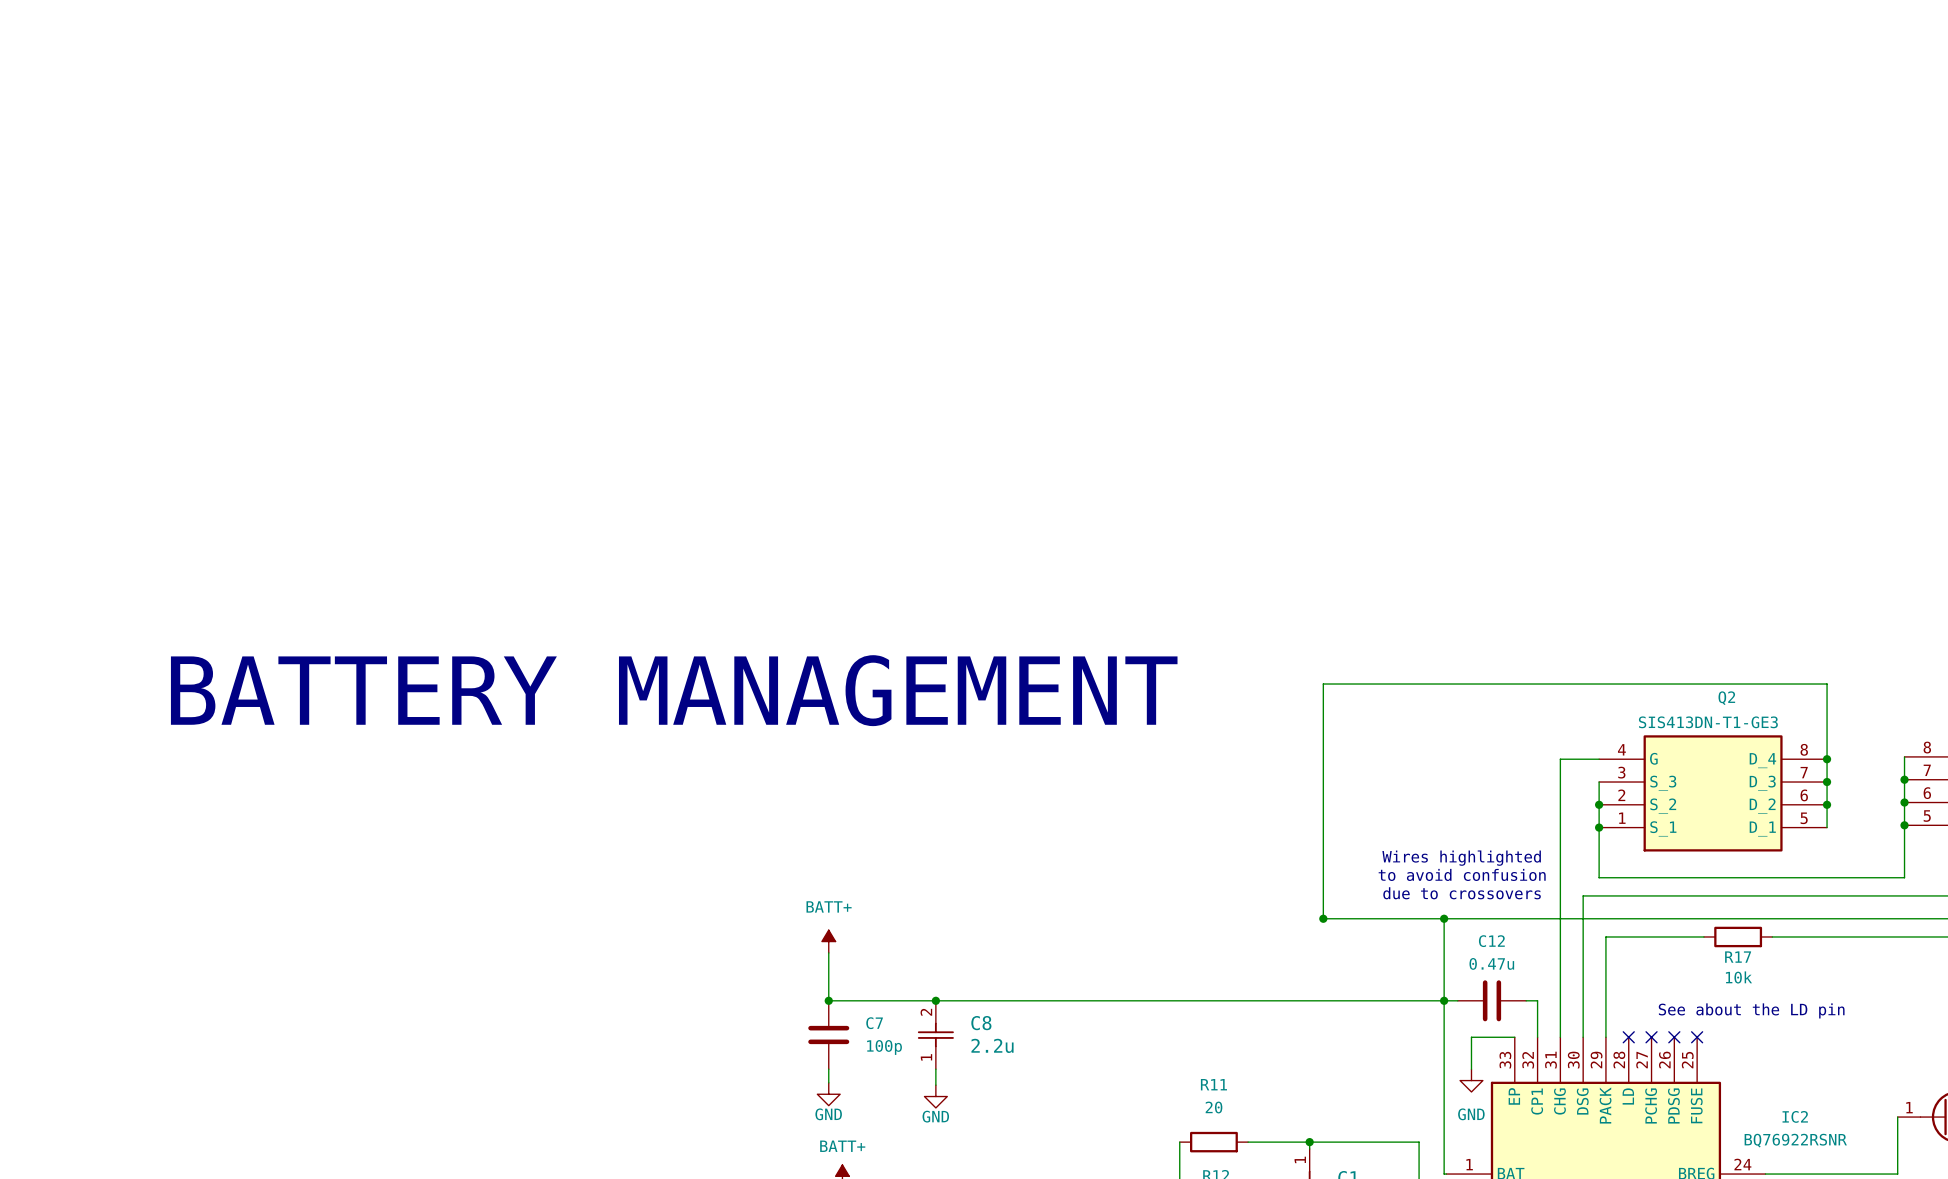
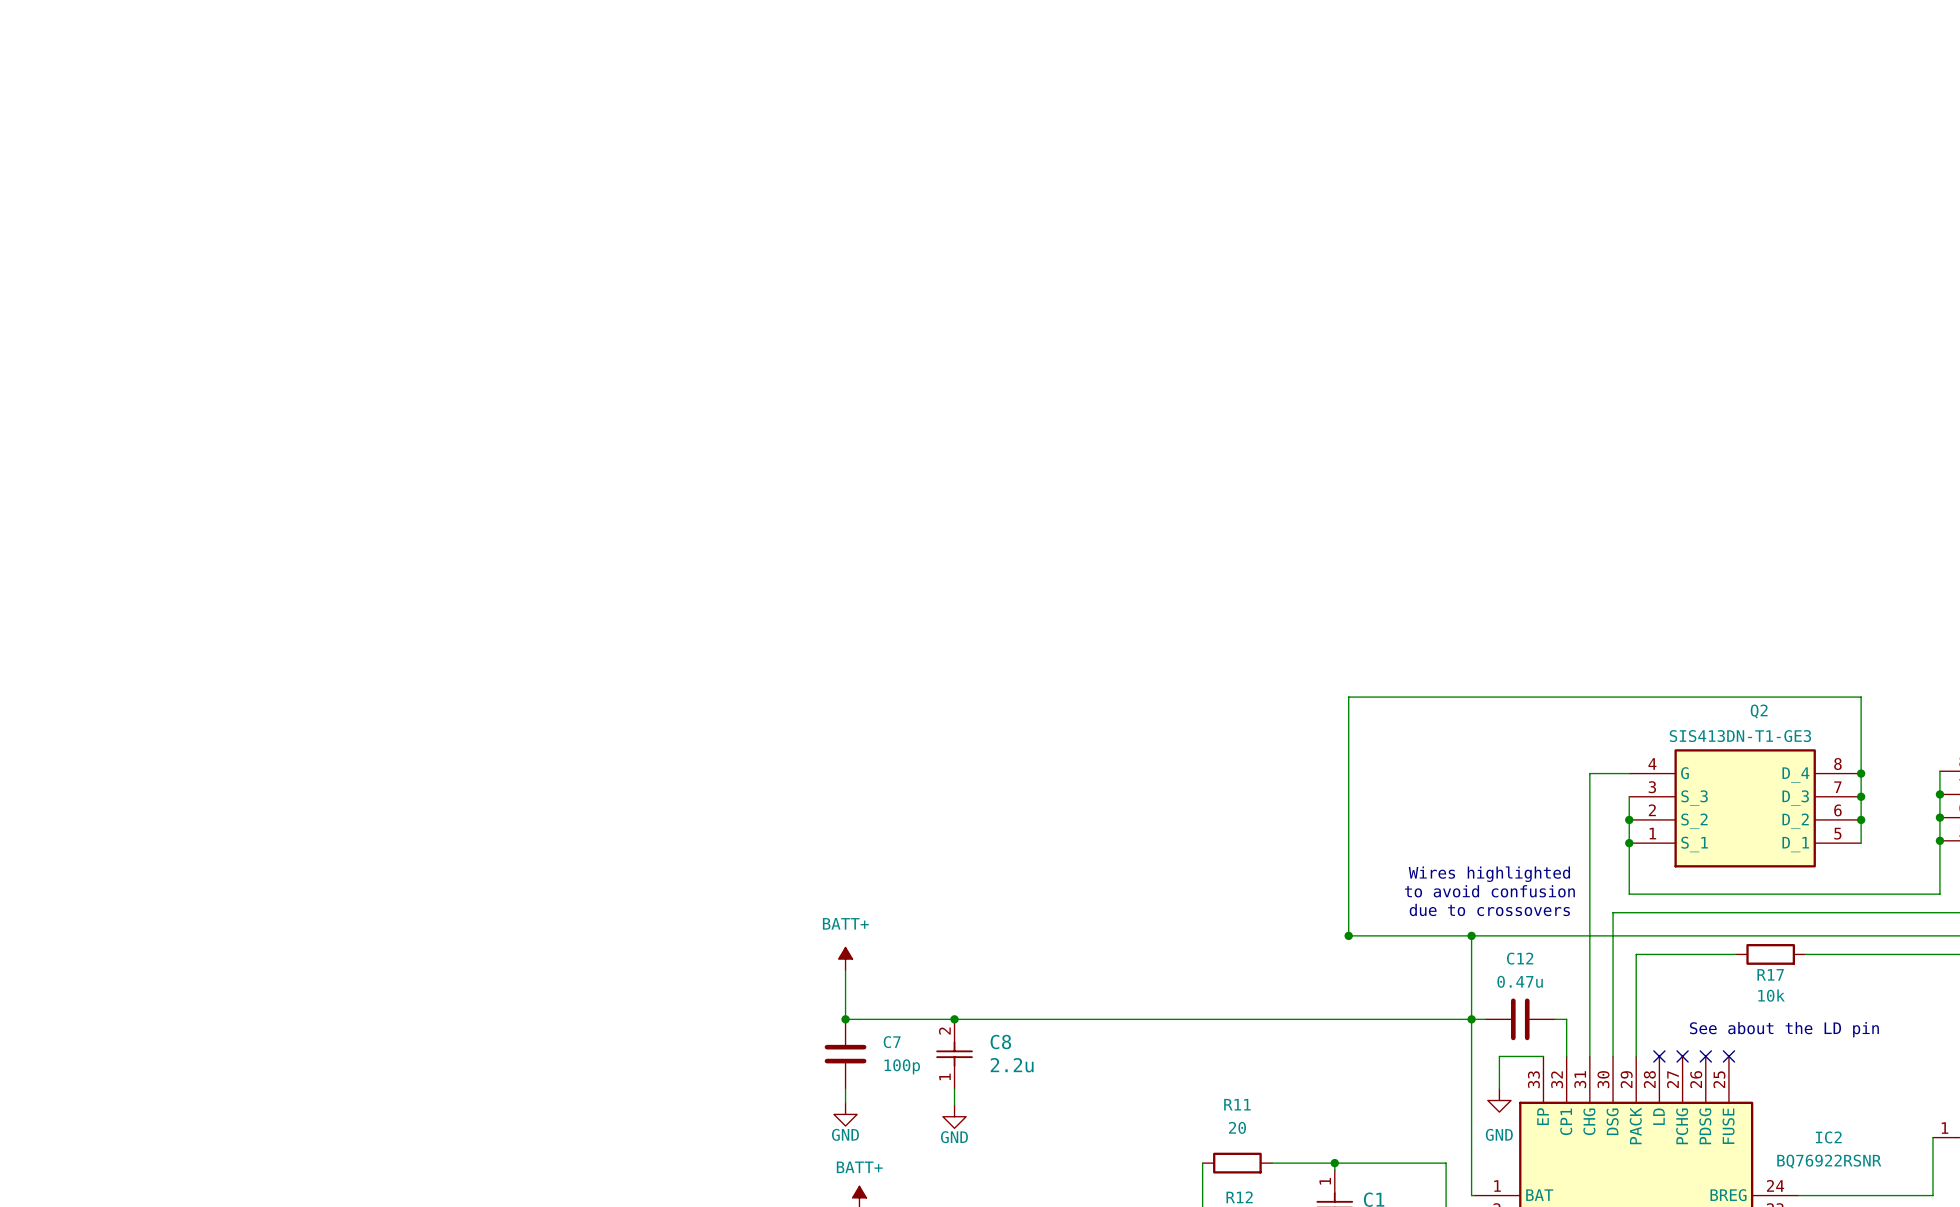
text: BATTERY MANAGEMENT (674, 690) -> none

